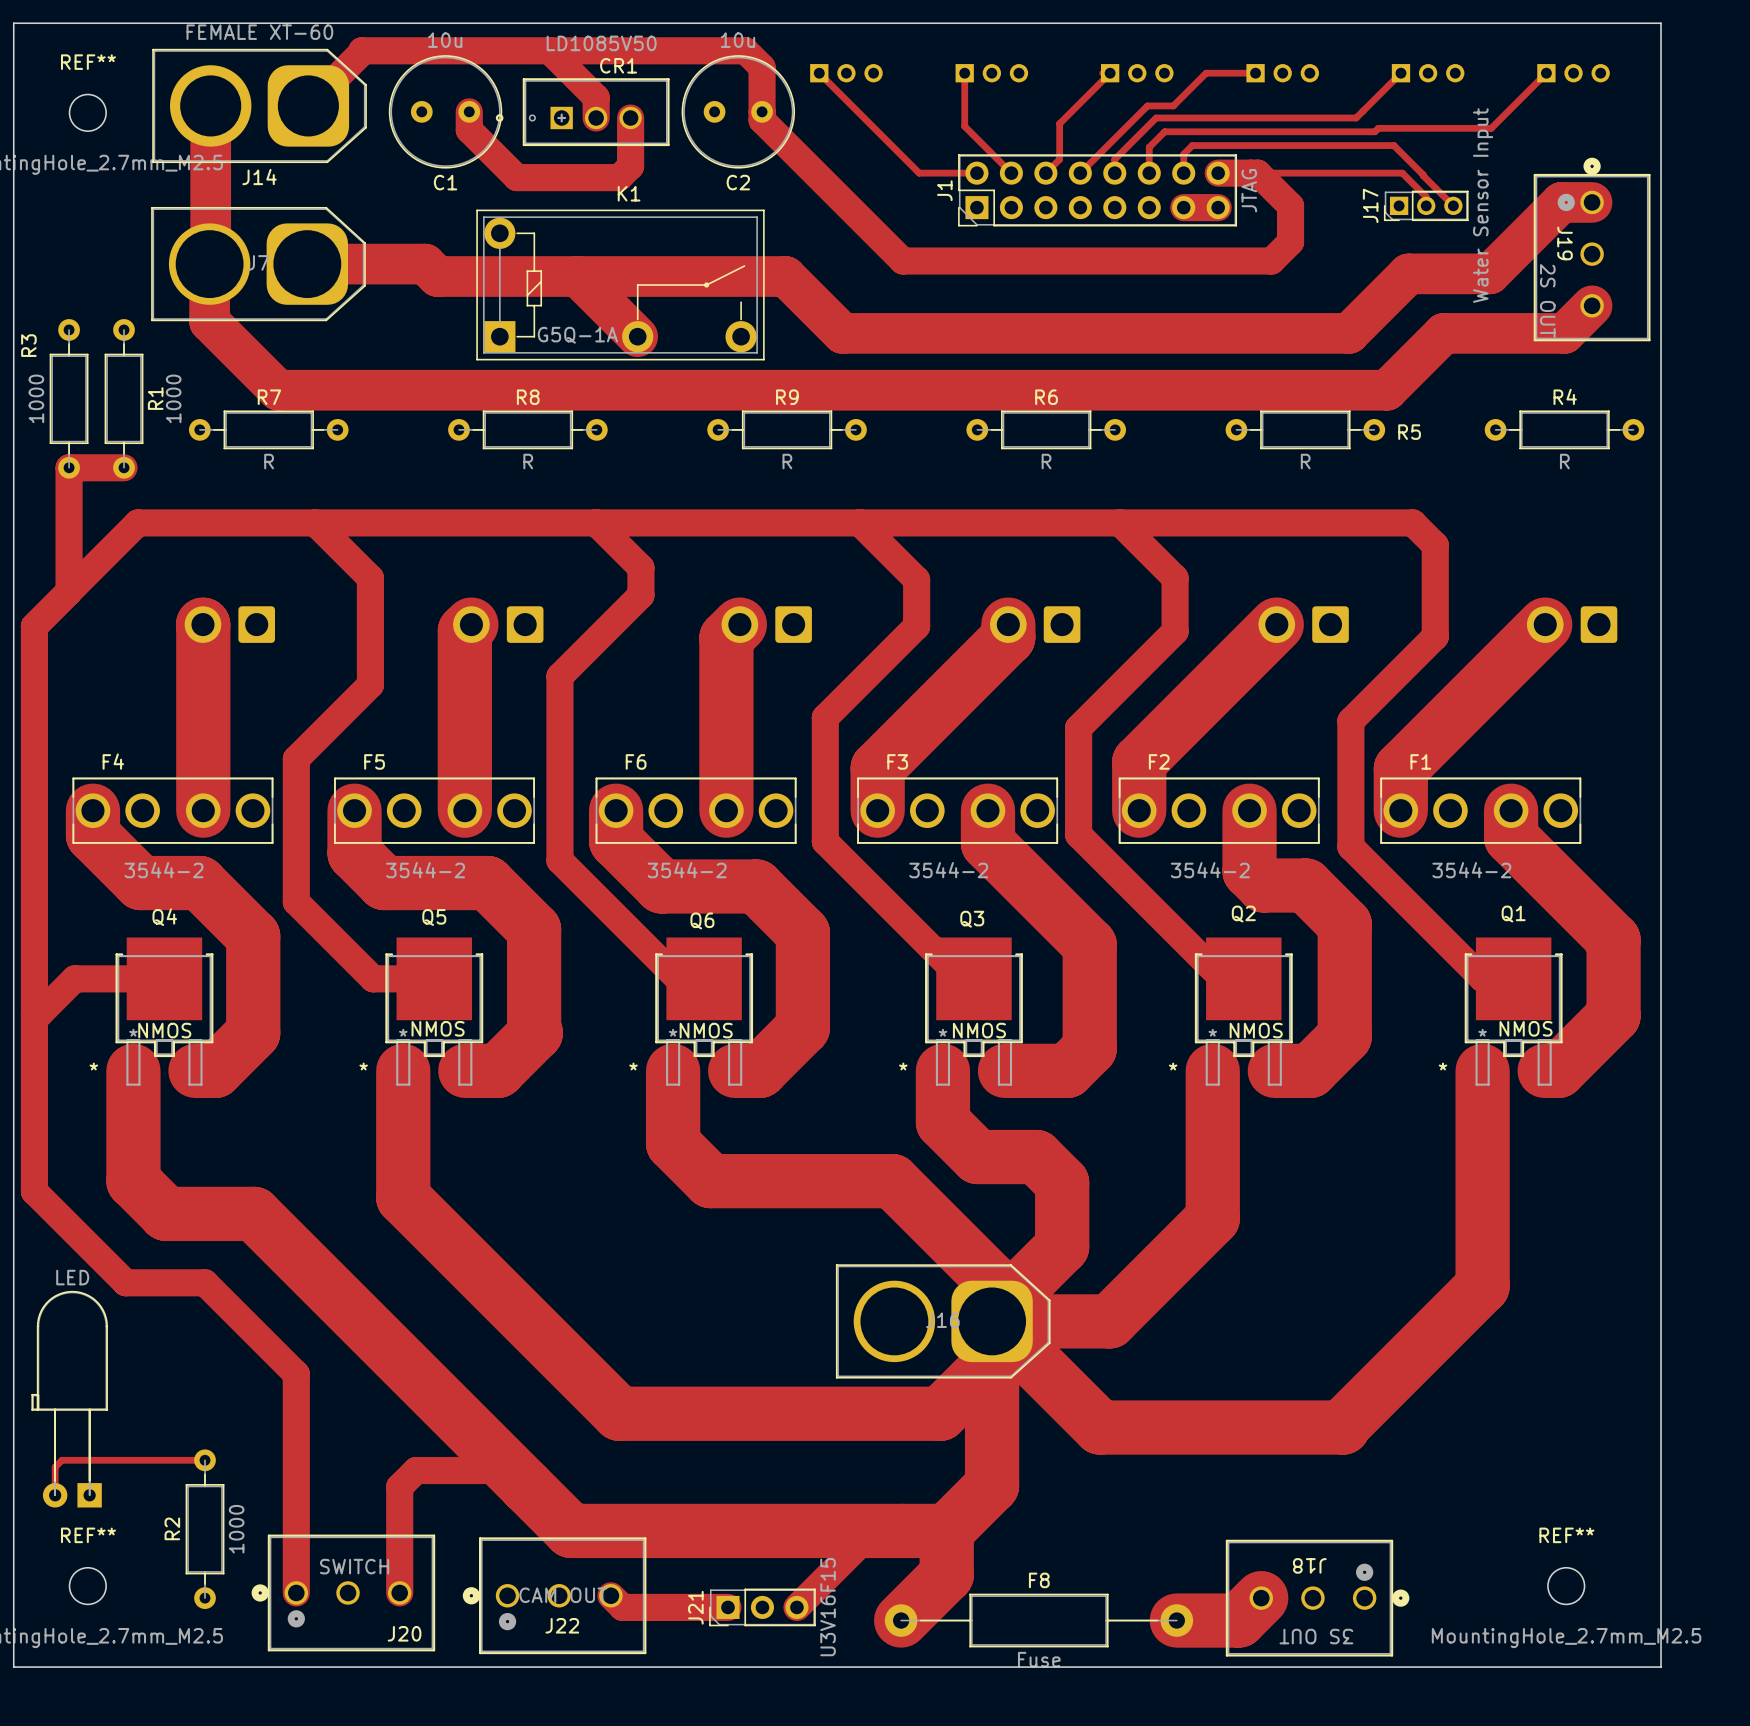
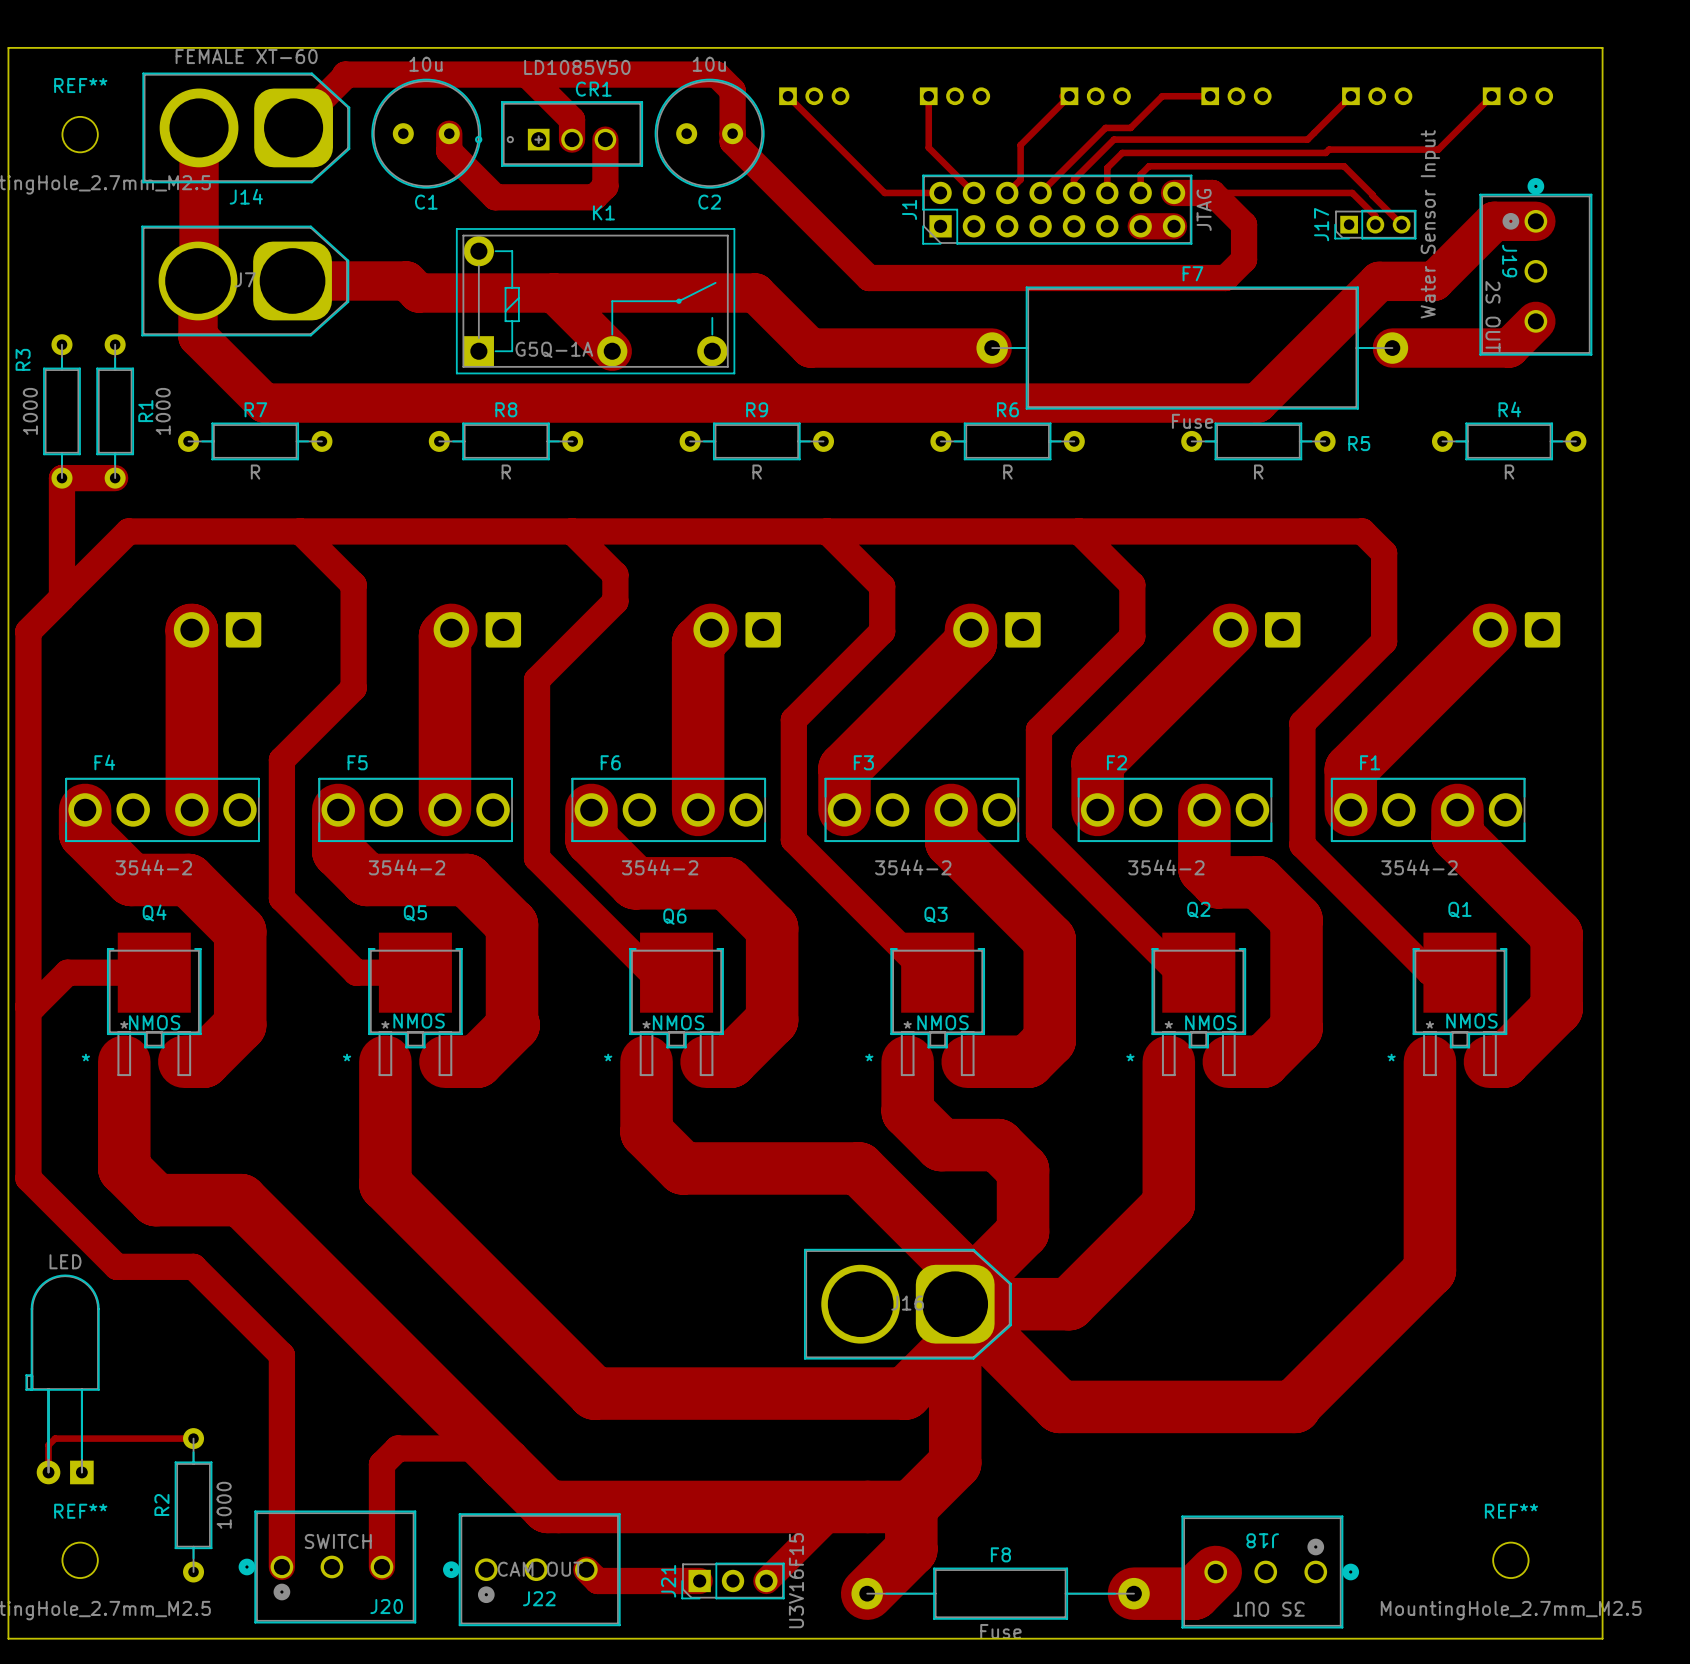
track: (1561, 202) (1489, 273) (1408, 273) (1349, 333) (1030, 333) -> none
F7: none -> Fuse (1192, 348)
track: (1443, 333) (1386, 390) (1304, 390) -> (1506, 221) (1494, 221) (1434, 281) (1379, 281) (1257, 403)

